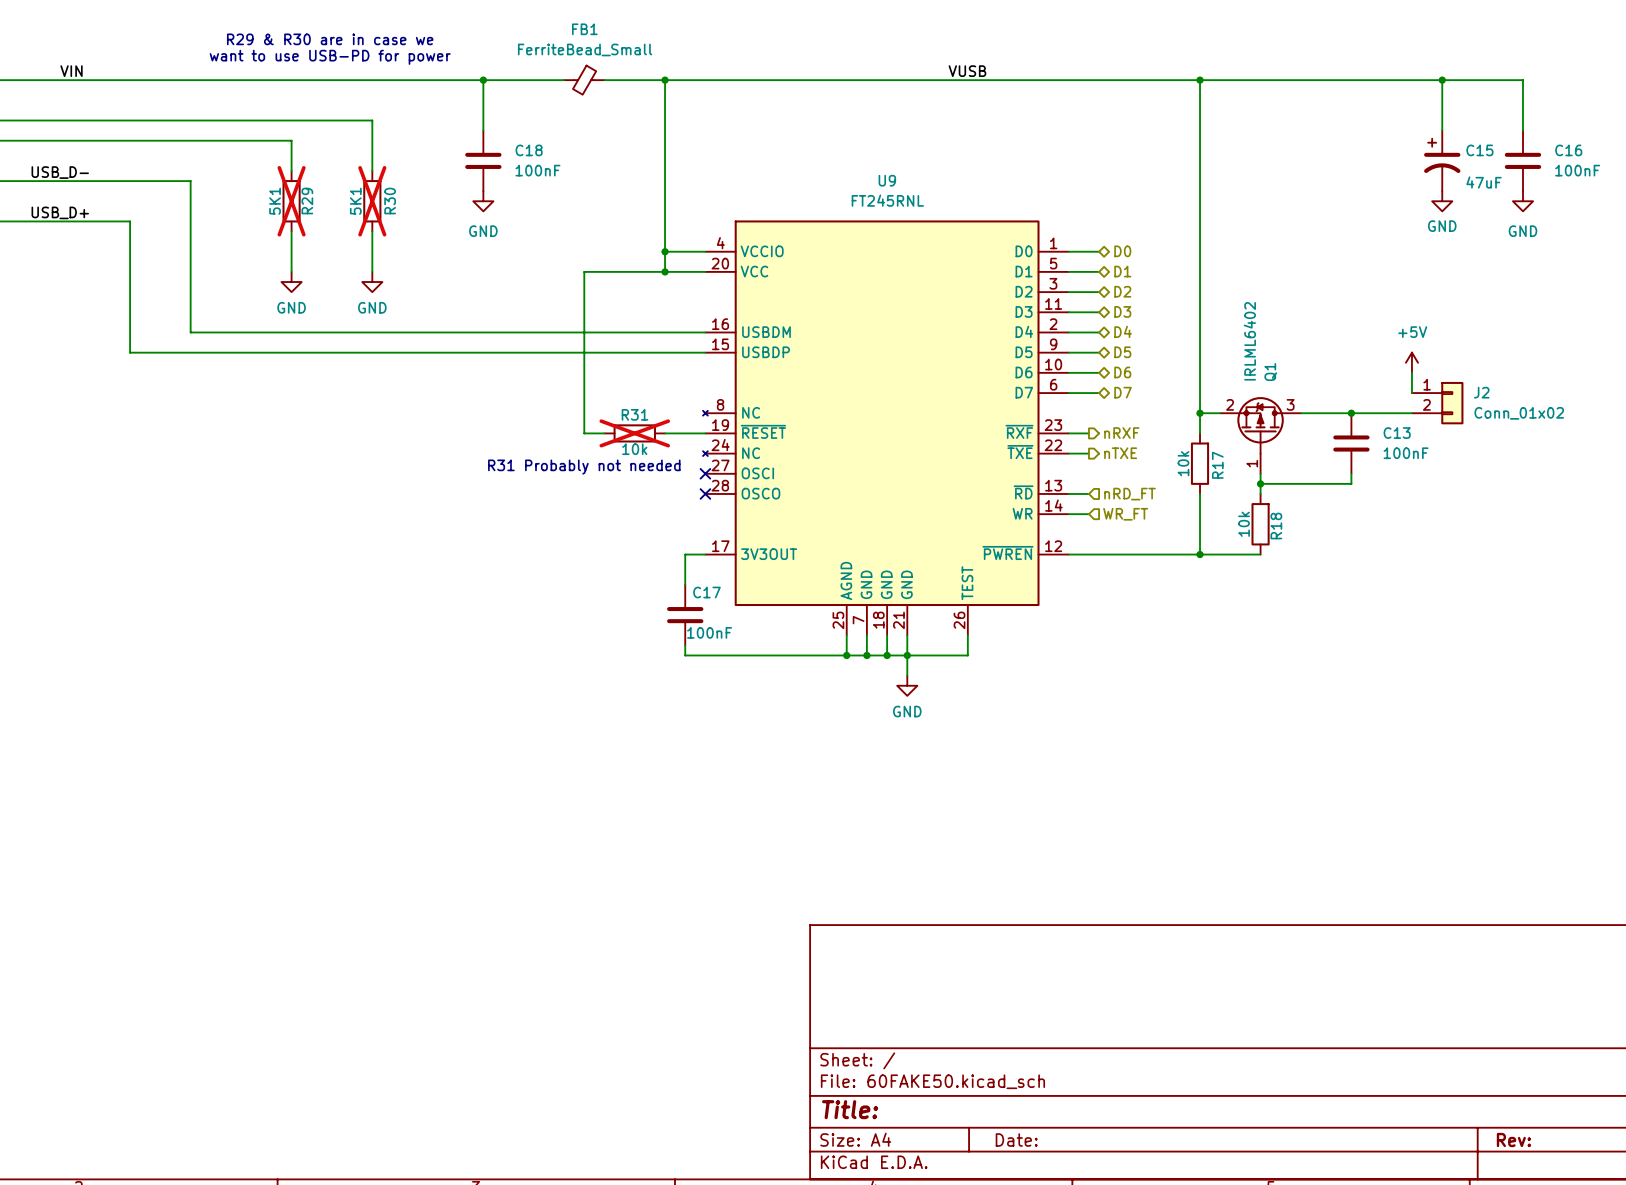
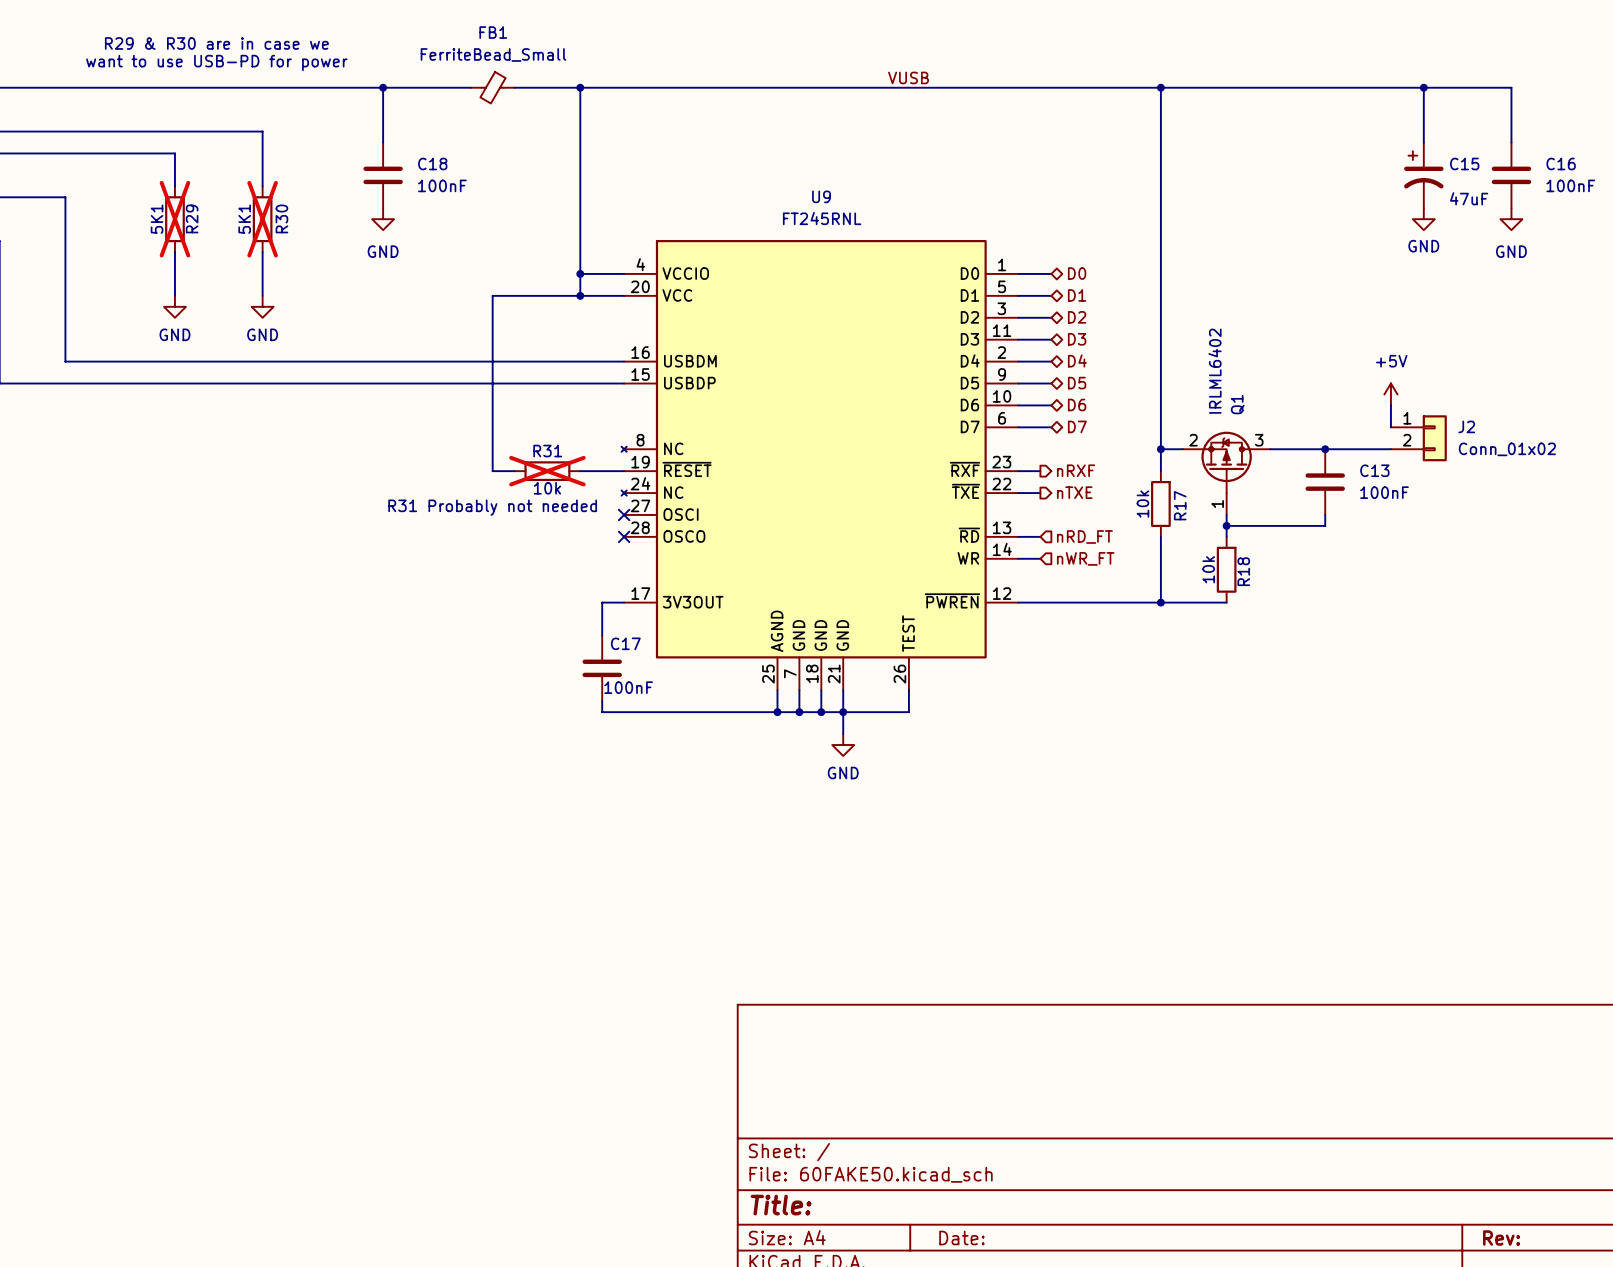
hierarchical label: WR_FT (1125, 514) -> nWR_FT (1085, 558)

